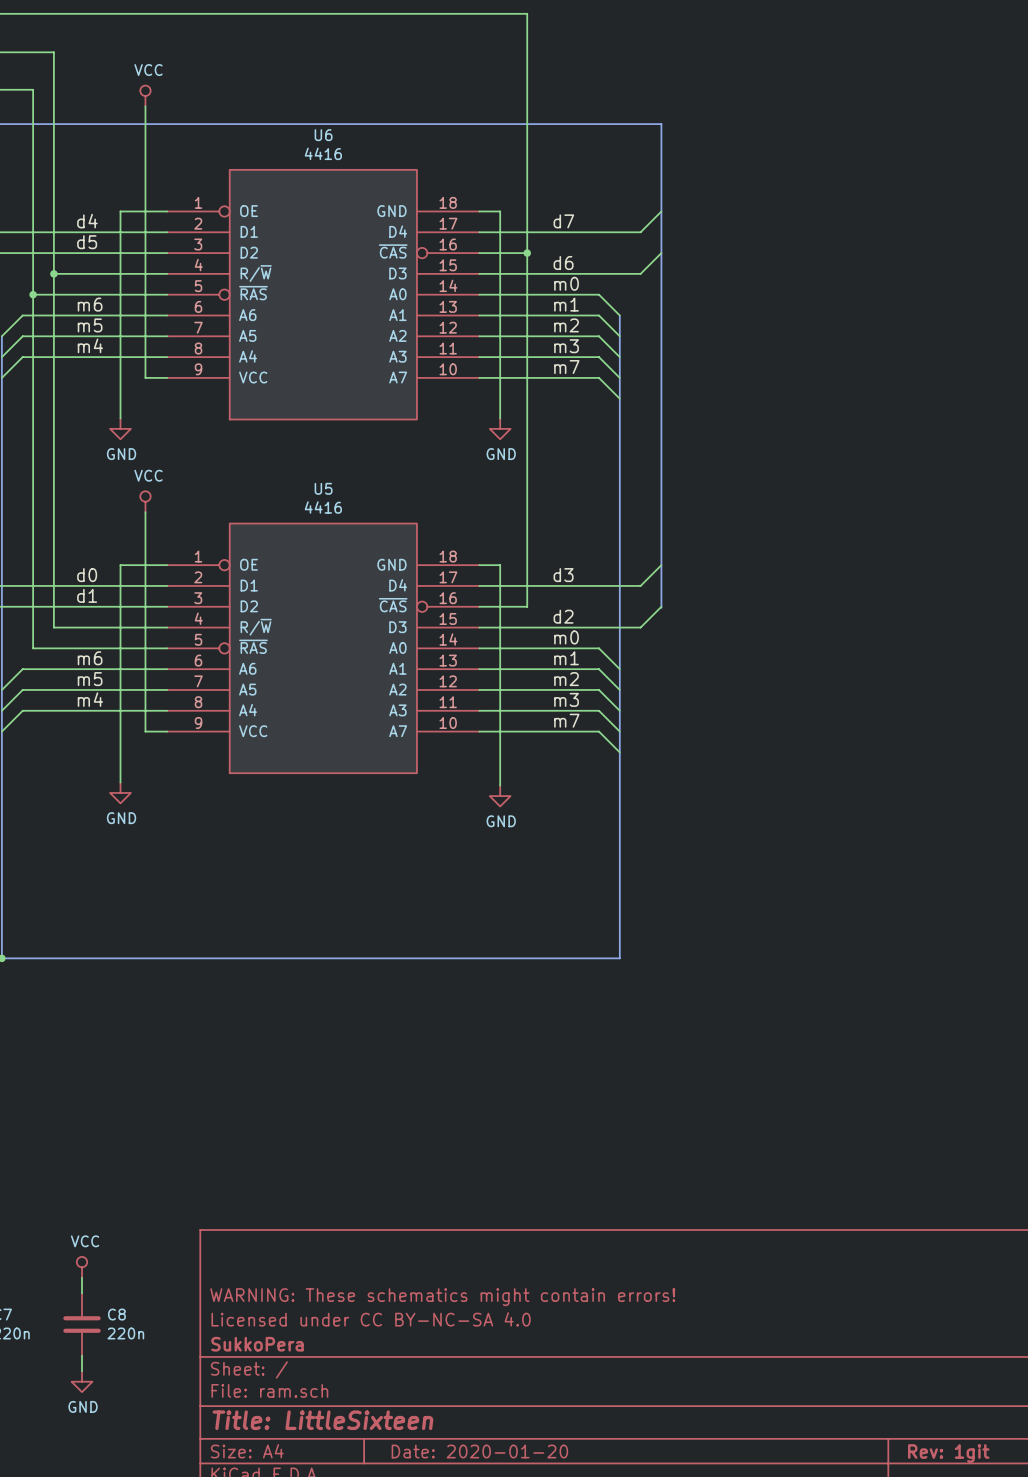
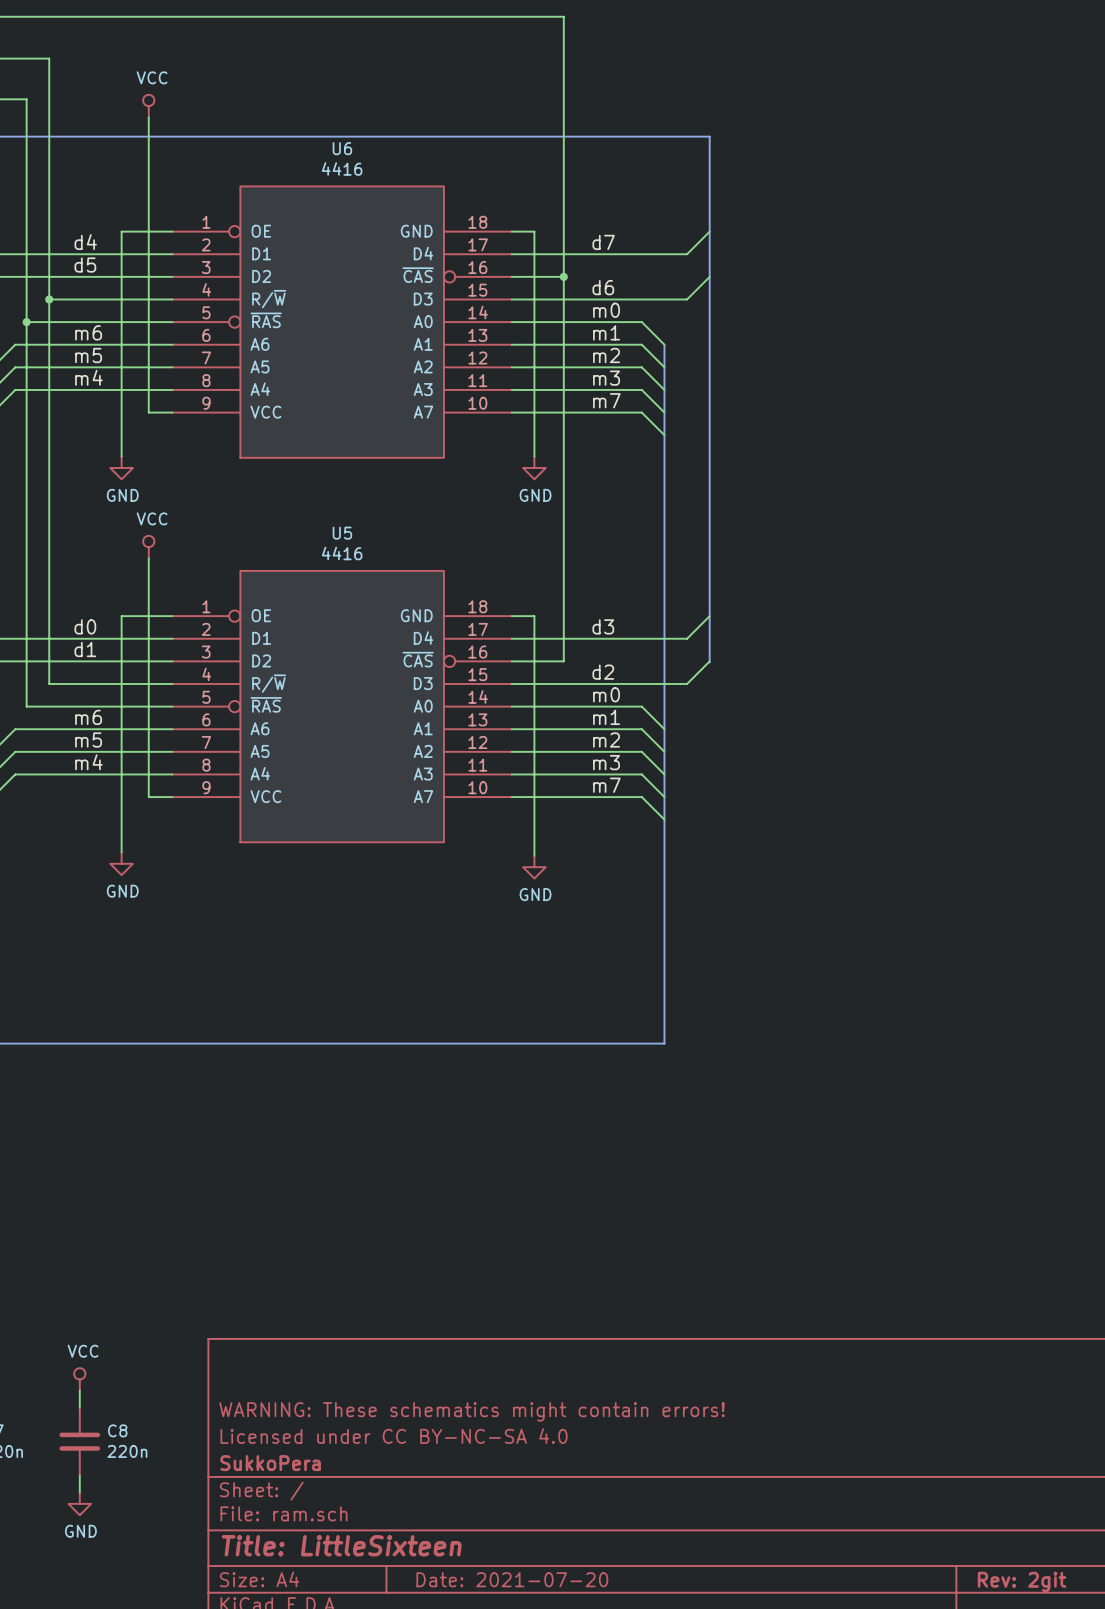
title block: Date: 2020-01-20 (479, 1451) -> Date: 2021-07-20 (512, 1579)
title block: Rev: 1git (948, 1453) -> Rev: 2git (1022, 1581)

